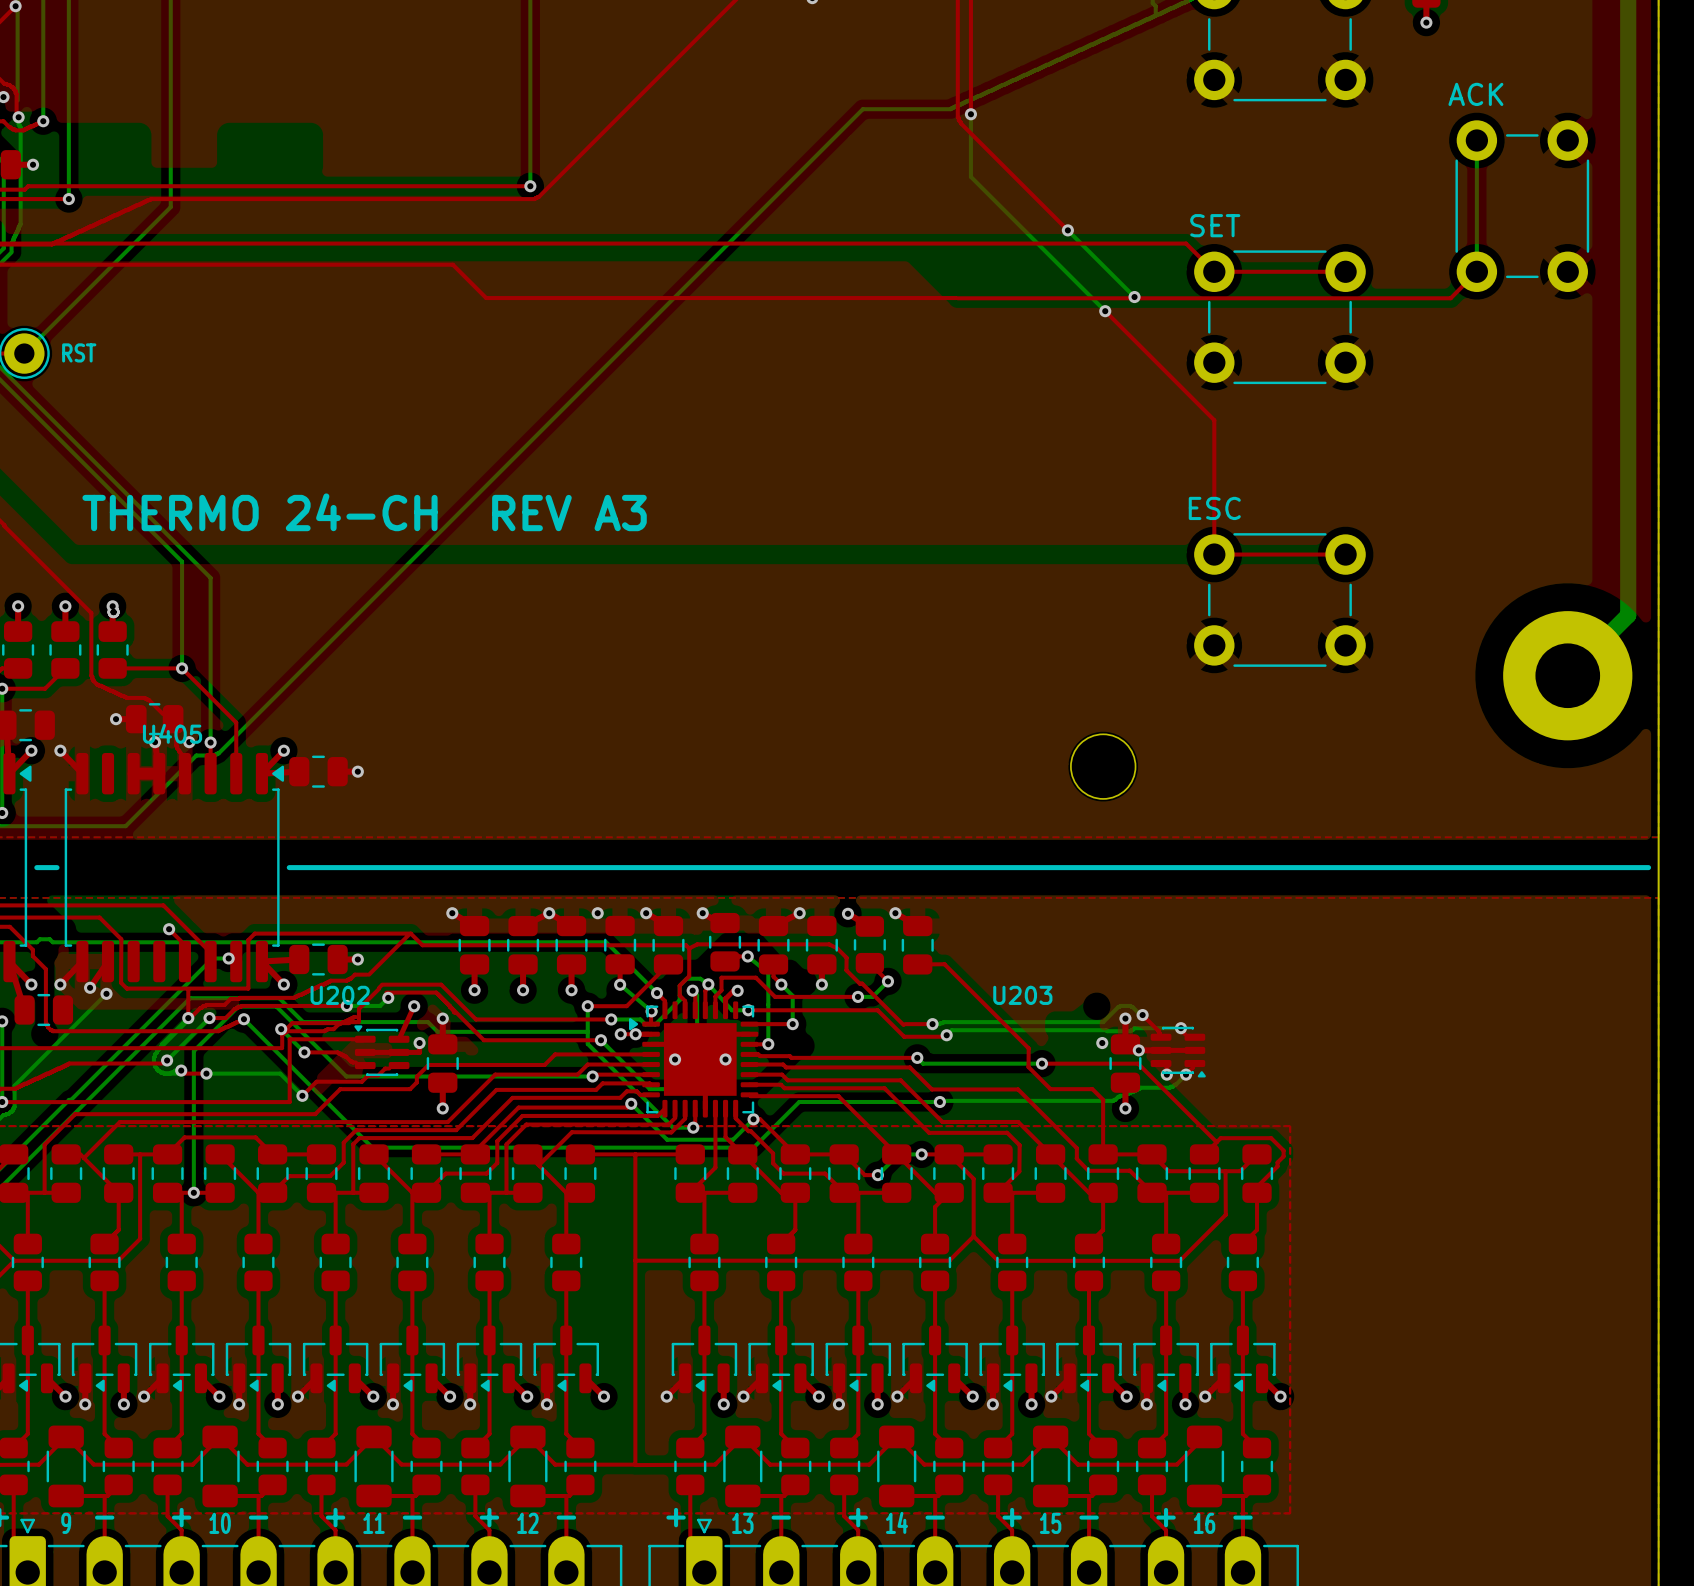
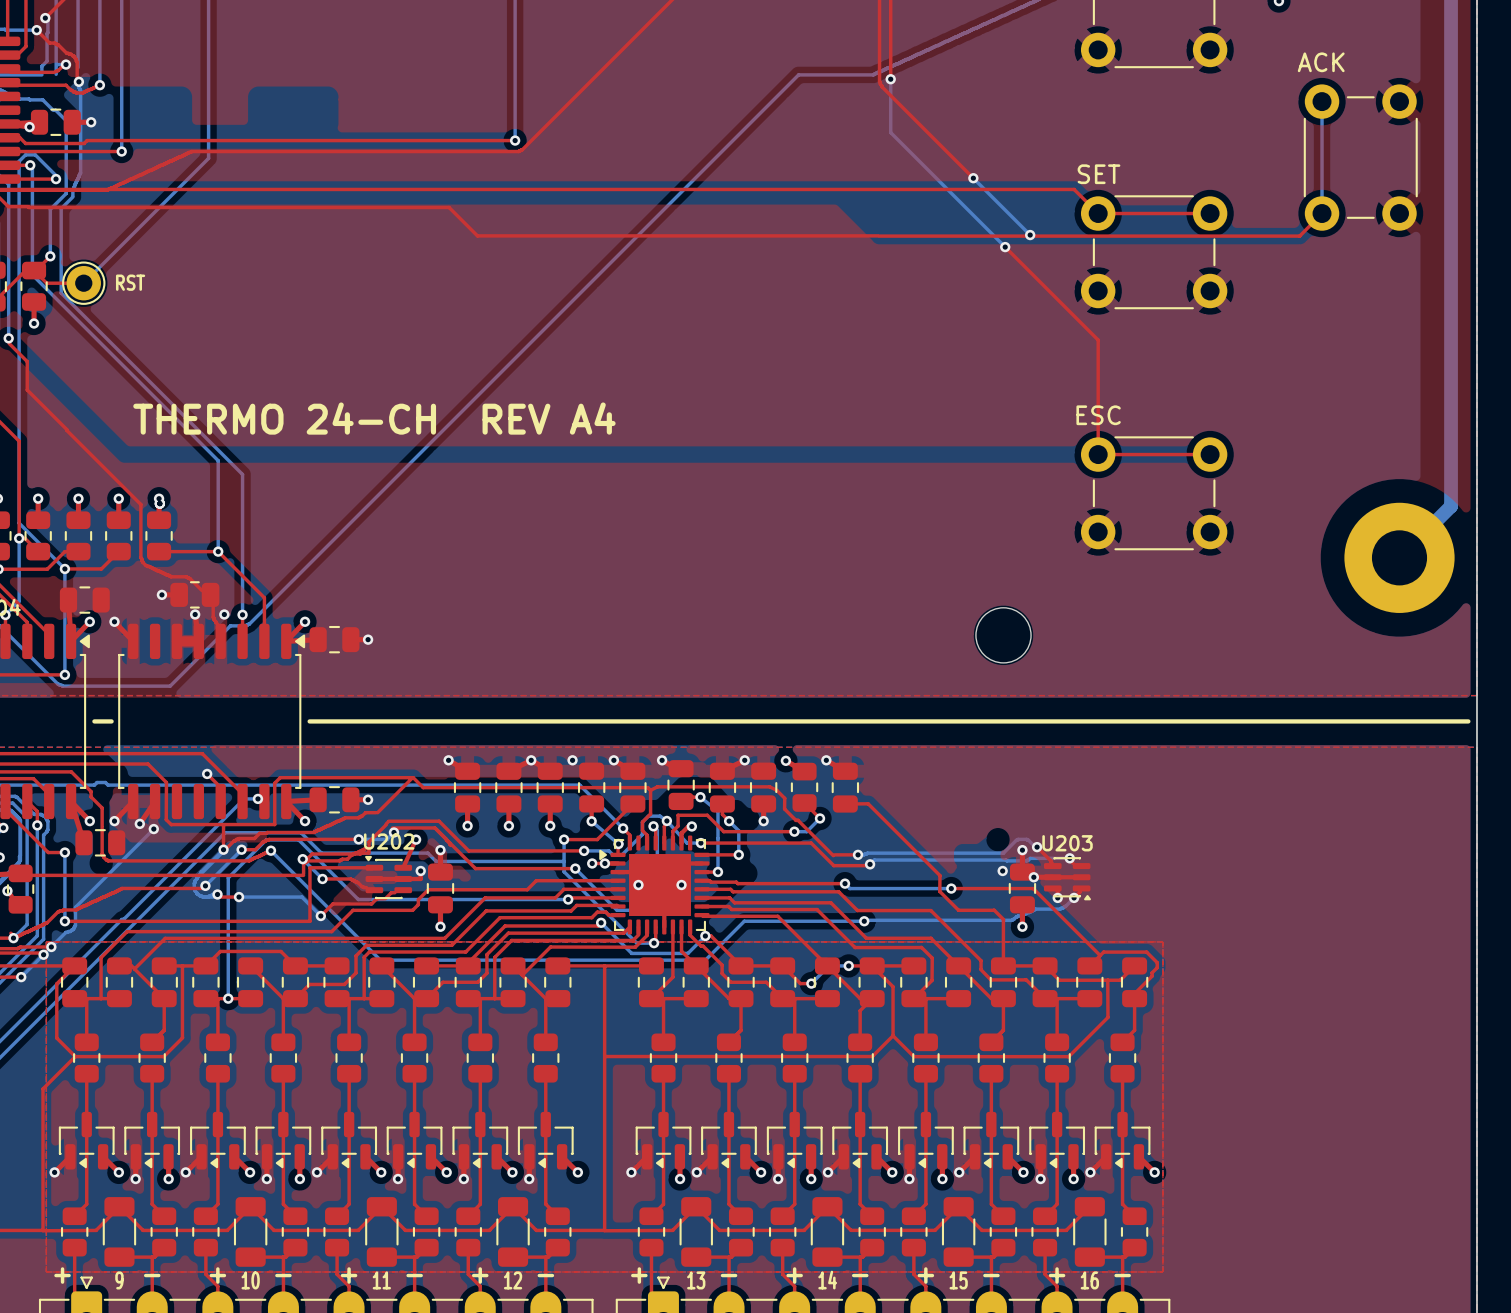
text: THERMO 24-CH REV A3 (364, 512) -> THERMO 24-CH REV A4 (374, 418)
text: U405 (172, 733) -> none
text position: U202 (340, 995) -> U202 (389, 841)
text position: U203 (1022, 995) -> U203 (1067, 843)

